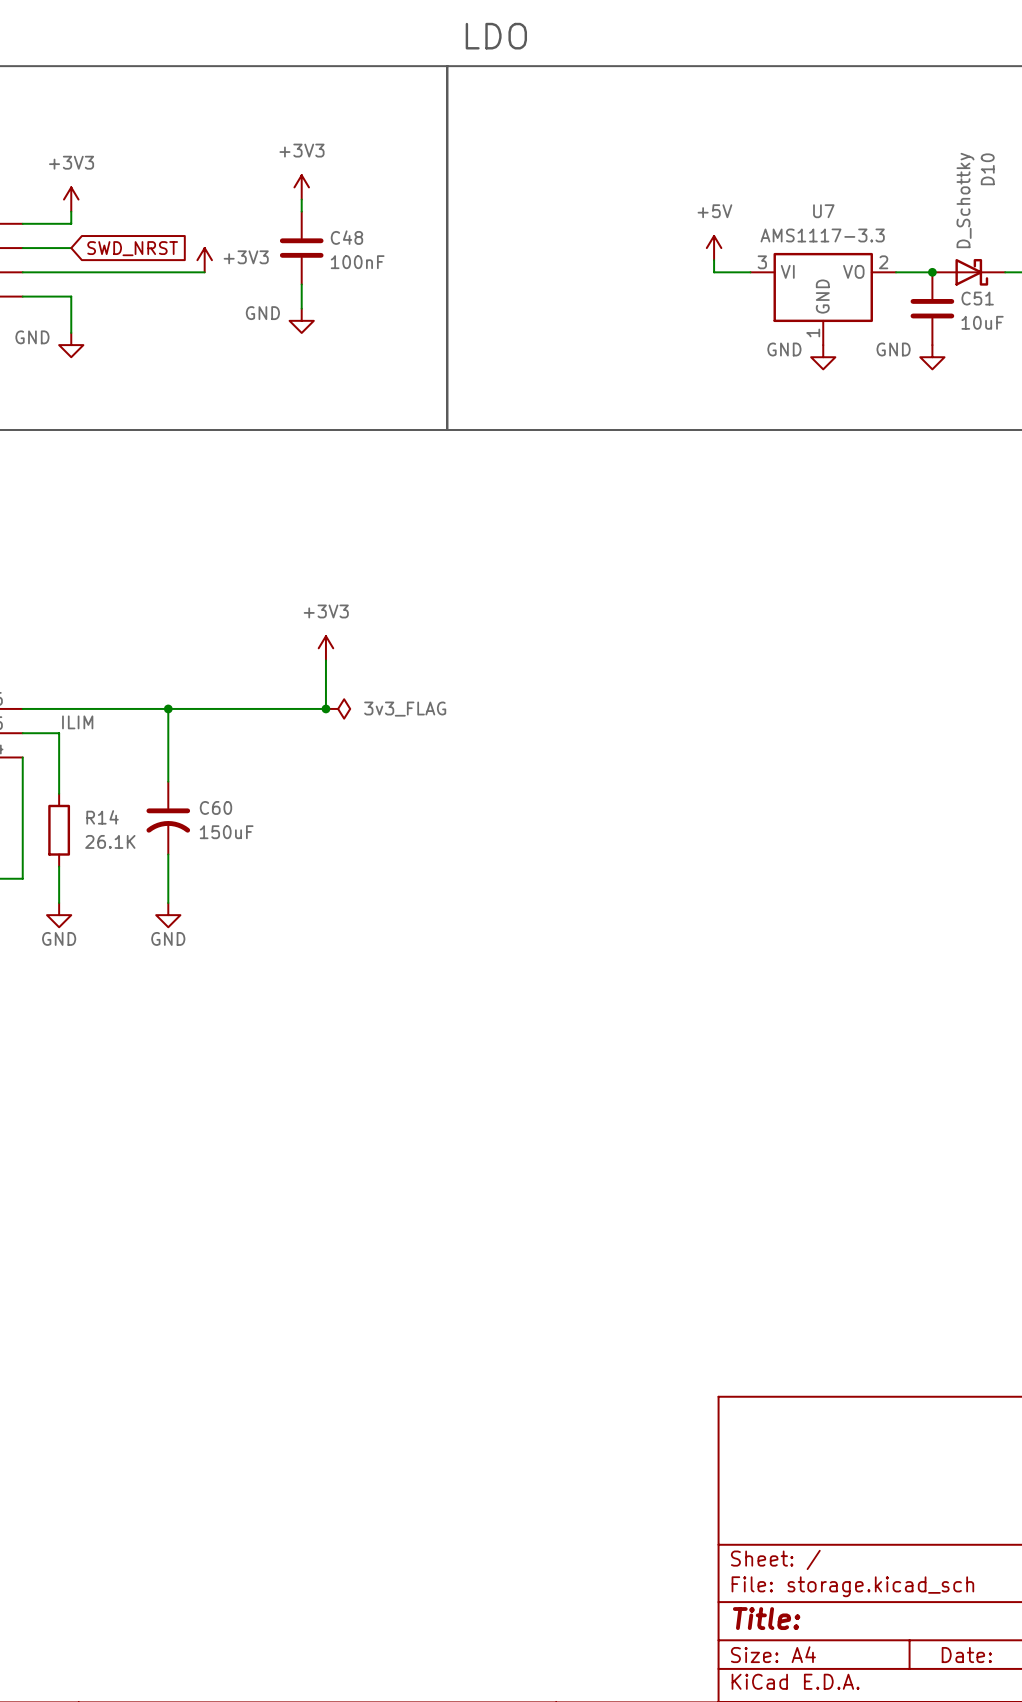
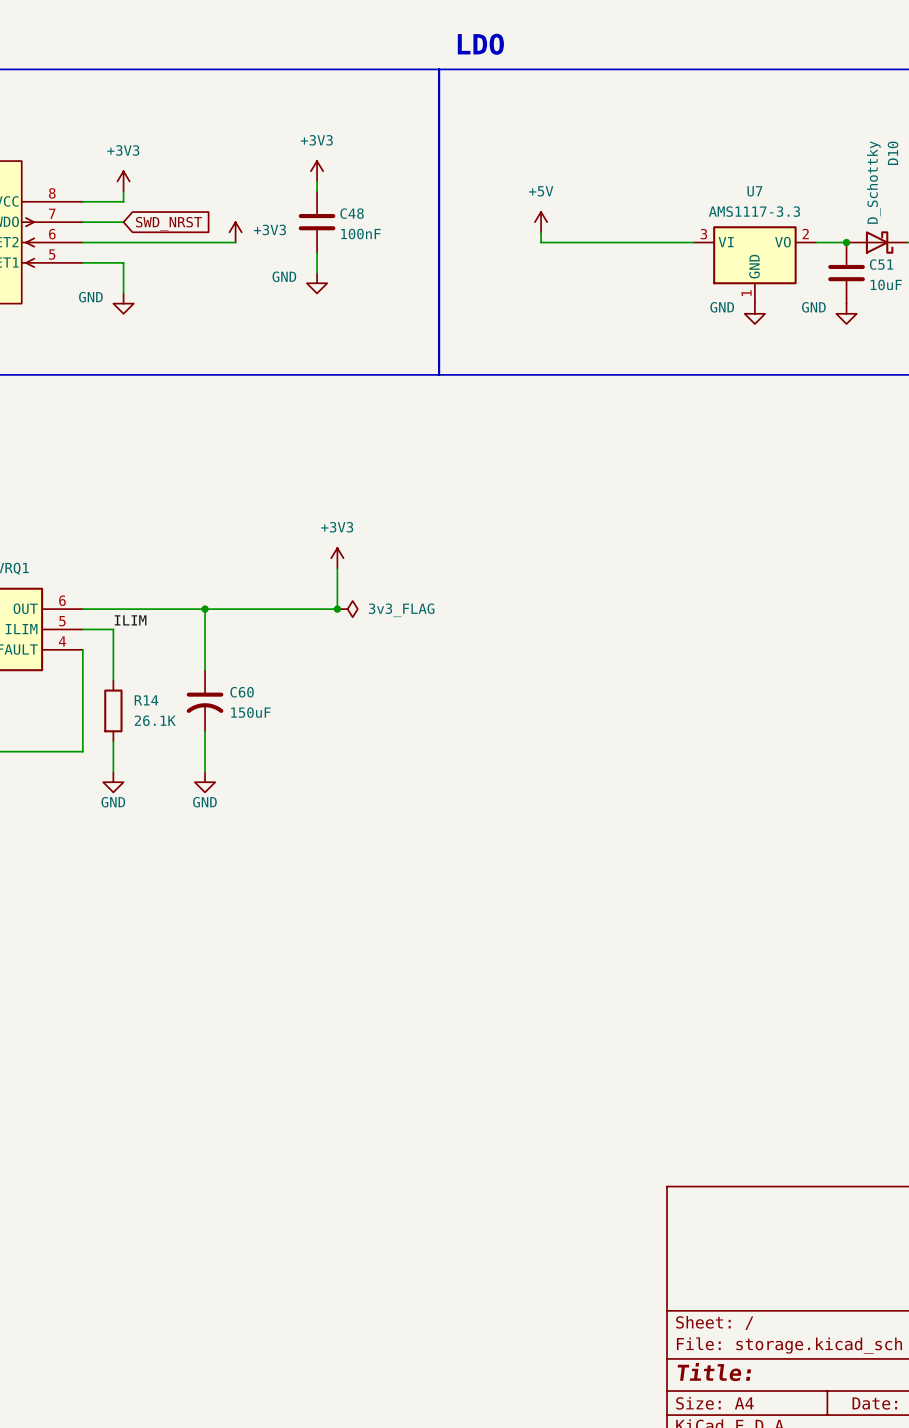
power symbol position: +5V (714, 248) -> +5V (541, 222)
wire: (714, 260) (714, 272) -> (541, 232) (541, 242) (663, 242)

